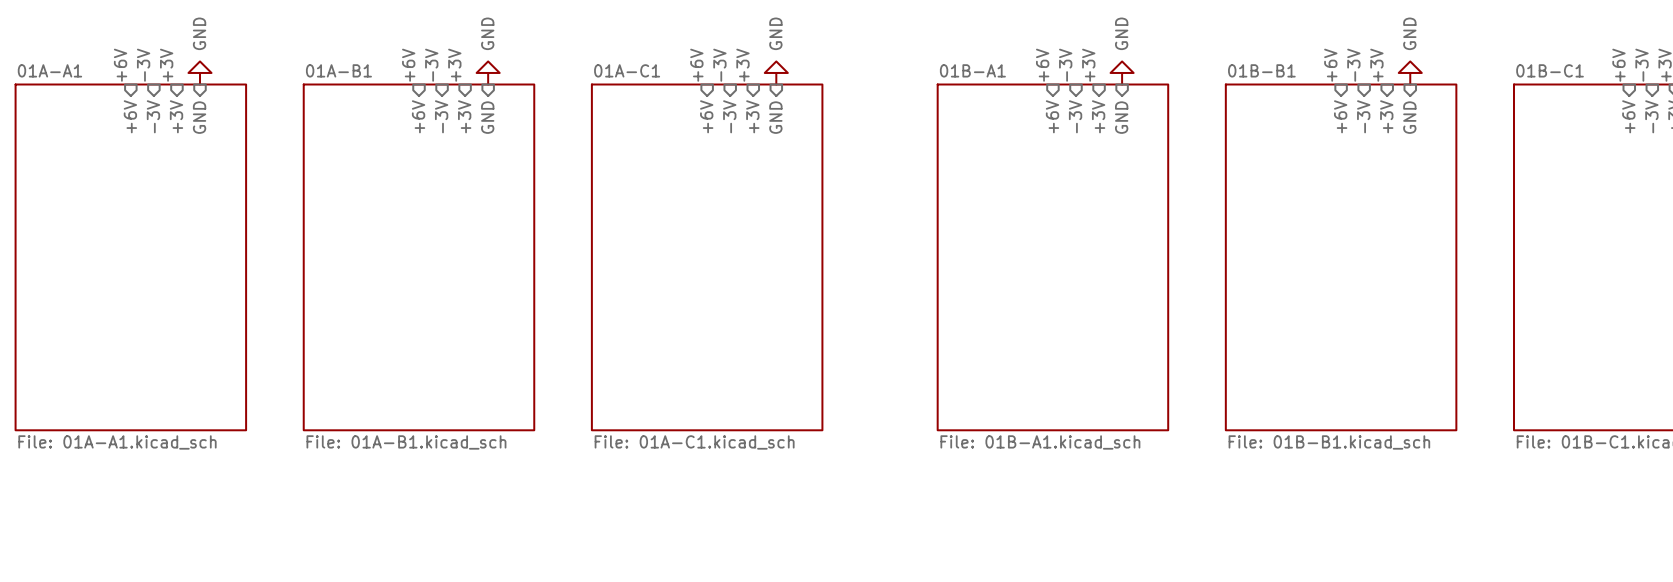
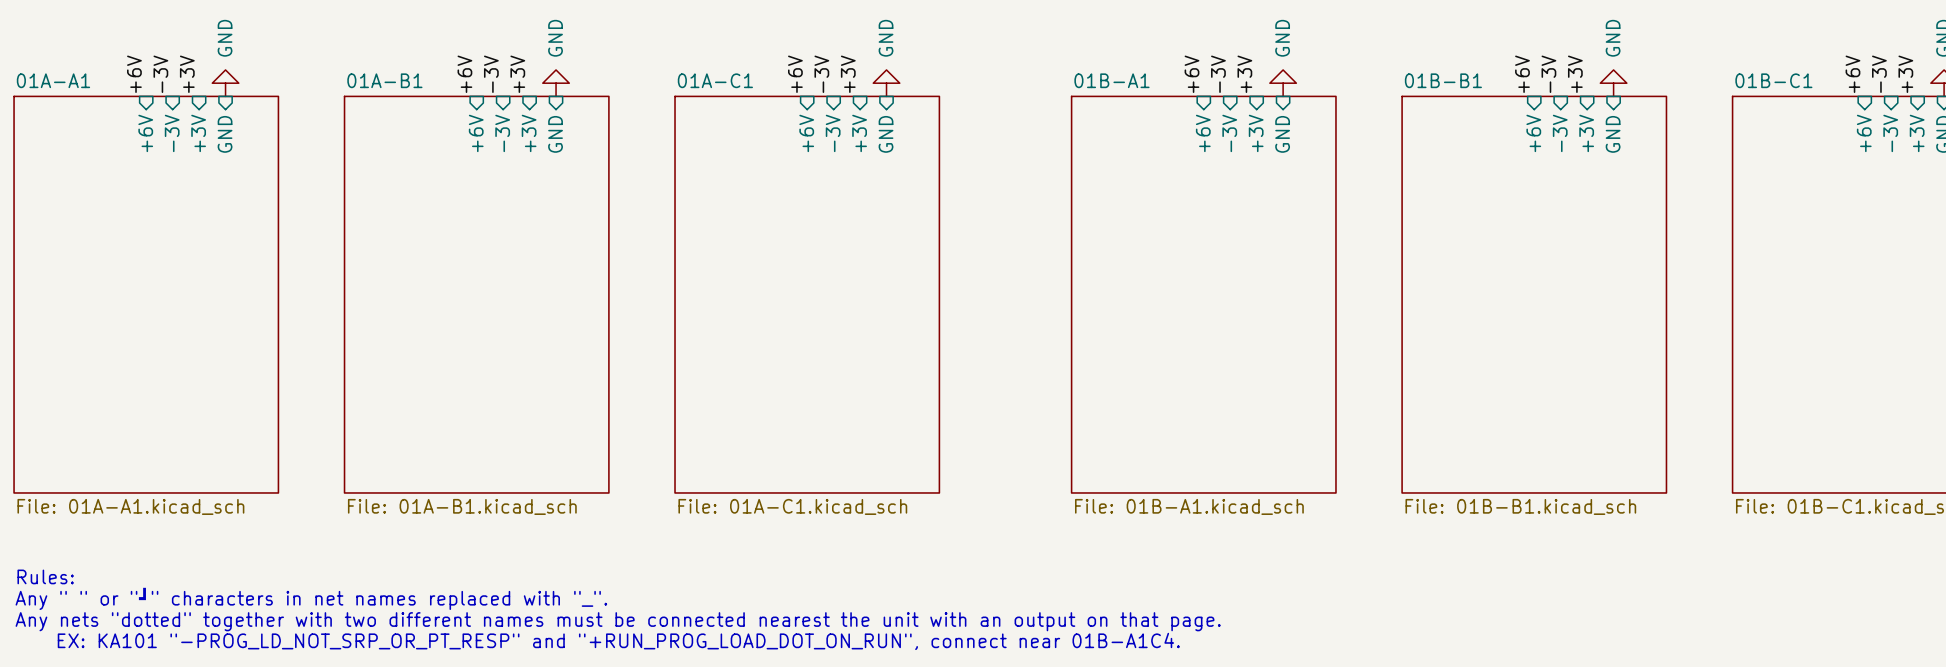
text: none -> Rules: (45, 576)
text: none -> Any " " or "┛" characters in net names replaced with "_". (311, 598)
text: none -> Any nets "dotted" together with two different names must be connected nearest the unit with an output on that page. (618, 621)
text: none -> EX: KA101 "-PROG_LD_NOT_SRP_OR_PT_RESP" and "+RUN_PROG_LOAD_DOT_ON_RUN", connect near 01B-A1C4. (618, 641)

